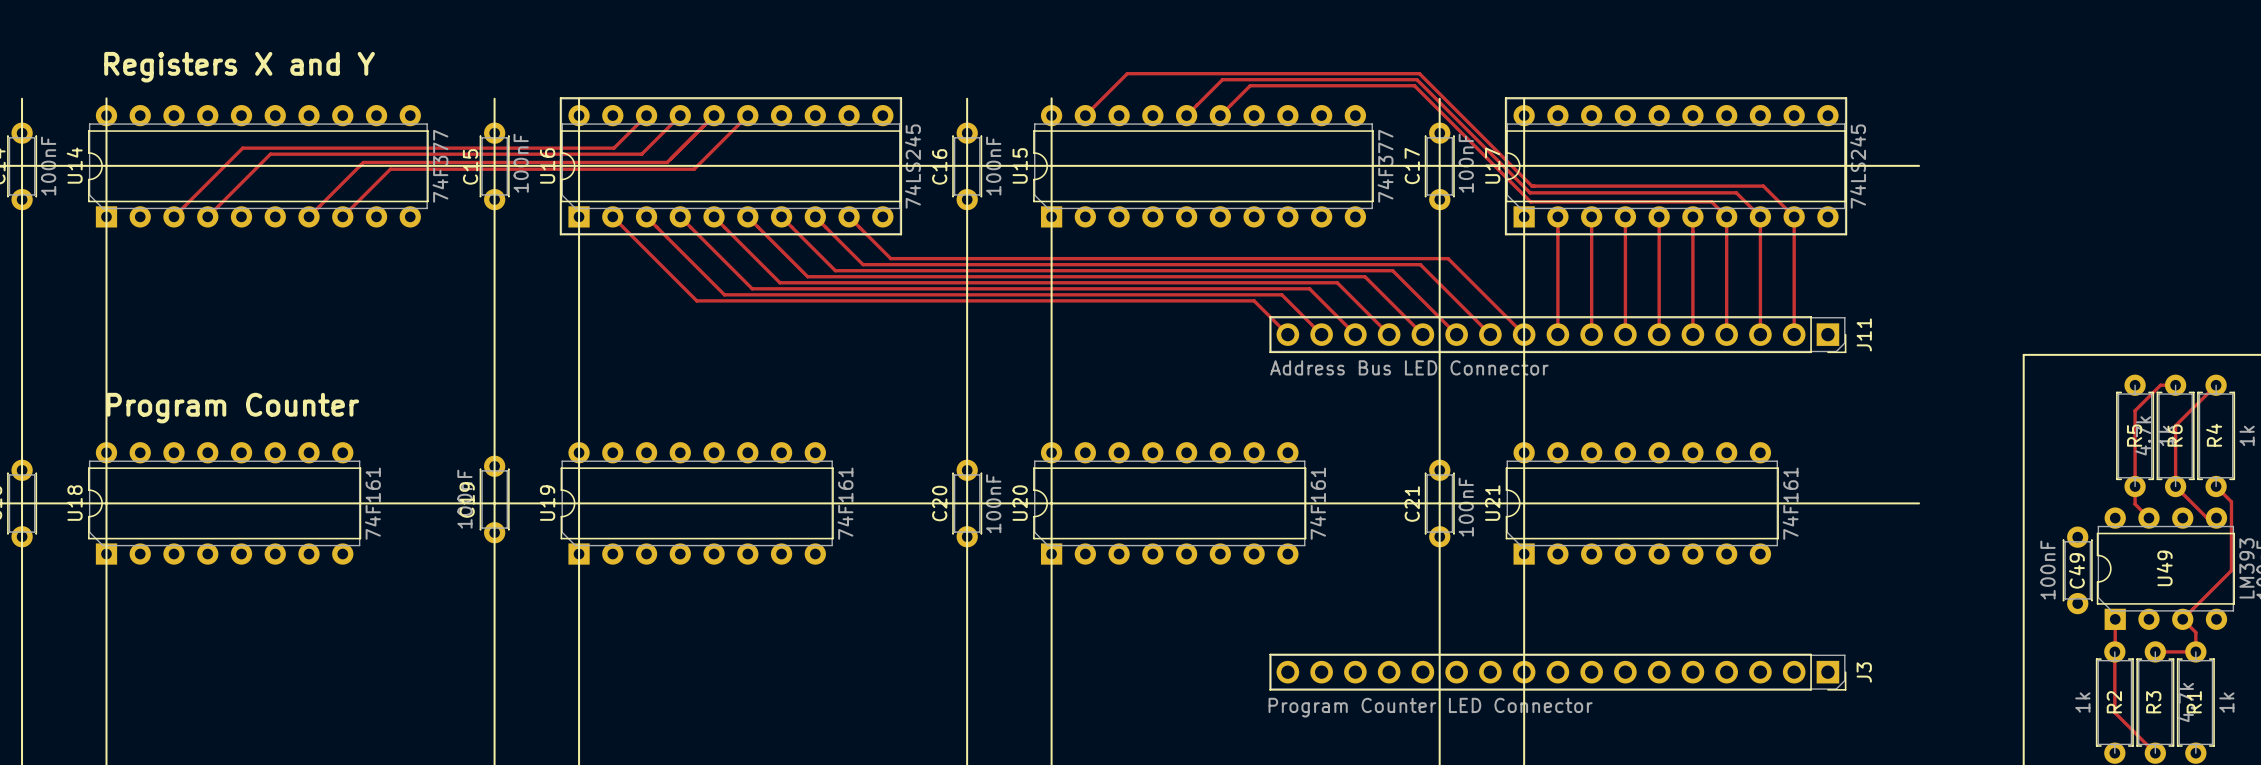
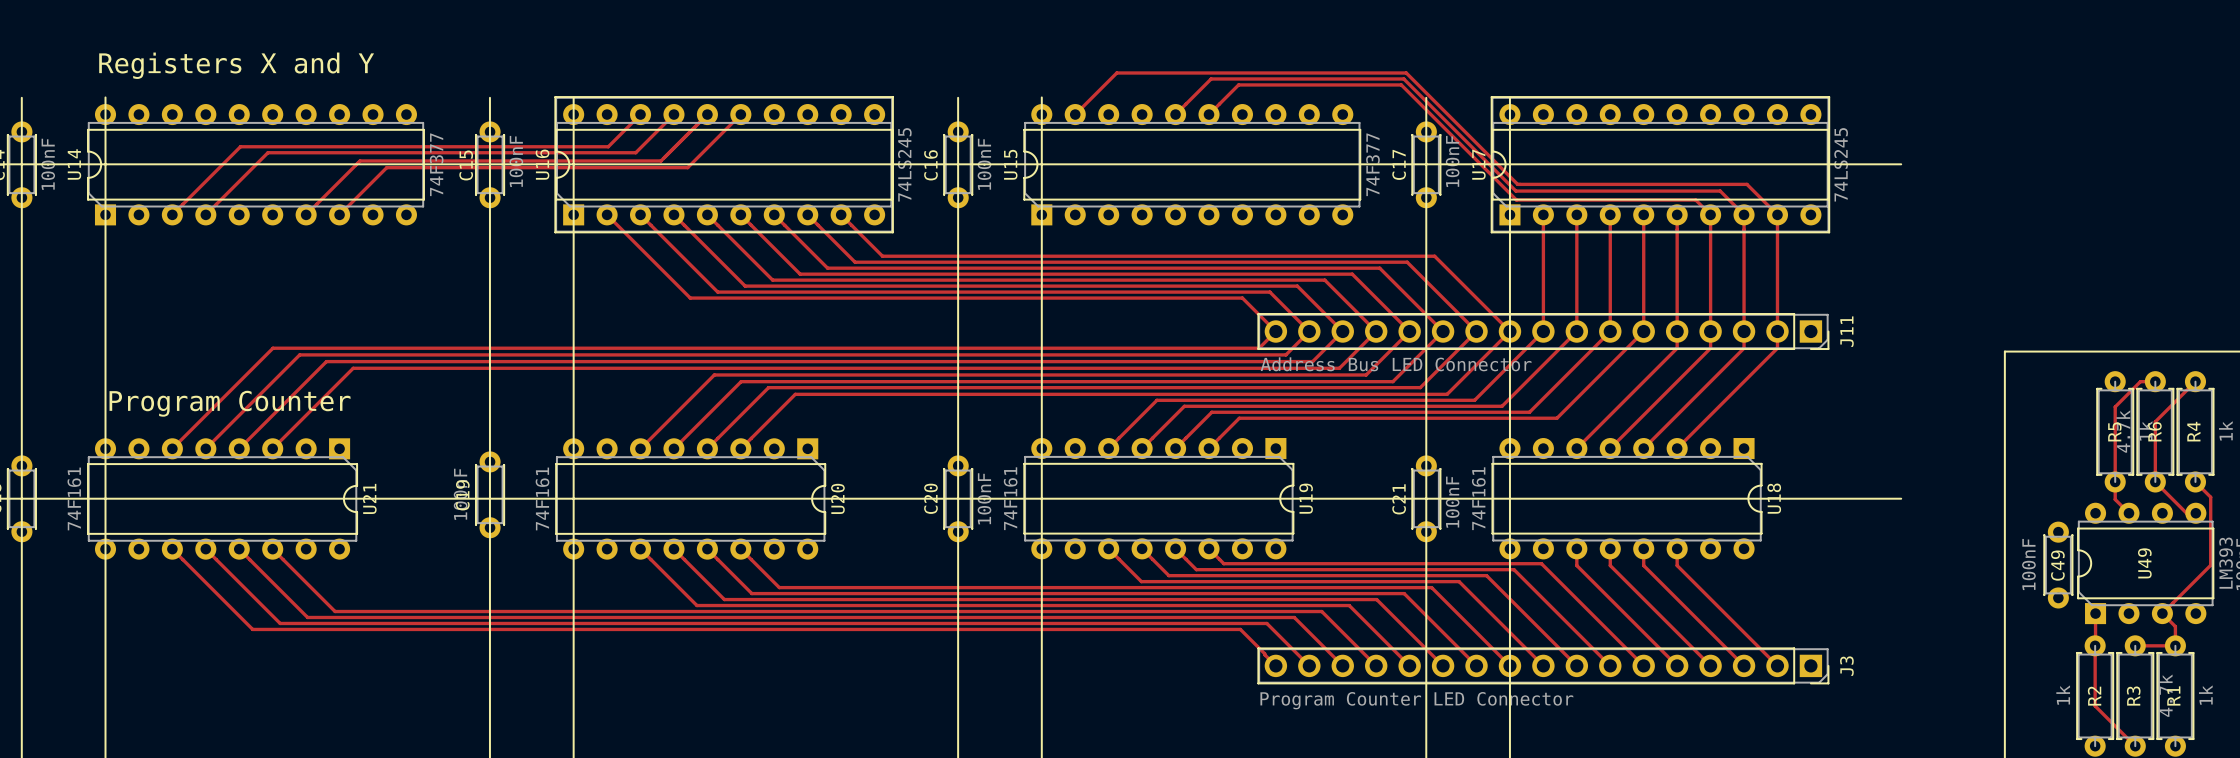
track: none -> (1275, 331) (1259, 348) (272, 348) (172, 448)
track: none -> (1309, 331) (1285, 354) (299, 354) (205, 448)
track: none -> (1342, 331) (1312, 361) (326, 361) (239, 448)
track: none -> (1376, 331) (1339, 368) (353, 368) (272, 448)
track: none -> (1409, 331) (1366, 374) (714, 374) (640, 448)
track: none -> (1443, 331) (1392, 381) (741, 381) (673, 448)
track: none -> (1476, 331) (1420, 387) (768, 387) (707, 448)
track: none -> (1509, 331) (1447, 394) (795, 394) (740, 448)
track: none -> (1543, 331) (1474, 400) (1156, 400) (1108, 448)
track: none -> (1576, 331) (1502, 406) (1184, 406) (1142, 448)
track: none -> (1610, 331) (1529, 412) (1211, 412) (1175, 448)
track: none -> (1643, 331) (1556, 418) (1239, 418) (1209, 448)
track: none -> (1677, 331) (1677, 348) (1576, 448)
track: none -> (1710, 331) (1710, 348) (1610, 448)
track: none -> (1744, 331) (1744, 348) (1643, 448)
track: none -> (1777, 331) (1777, 348) (1677, 448)
U18 rotation: 0° (224, 503) -> 180° (1627, 498)
U18 position: (224, 503) -> (1627, 498)
U19 rotation: 0° (697, 503) -> 180° (1158, 498)
U19 position: (697, 503) -> (1158, 498)
U20 rotation: 0° (1169, 503) -> 180° (690, 498)
U20 position: (1169, 503) -> (690, 498)
U21 rotation: 0° (1642, 503) -> 180° (222, 498)
U21 position: (1642, 503) -> (222, 498)
track: none -> (172, 549) (252, 629) (1240, 629) (1275, 665)
track: none -> (205, 549) (280, 623) (1266, 623) (1309, 665)
track: none -> (239, 549) (307, 617) (1294, 617) (1342, 665)
track: none -> (272, 549) (335, 611) (1321, 611) (1376, 665)
track: none -> (640, 549) (696, 605) (1349, 605) (1409, 665)
track: none -> (673, 549) (724, 599) (1376, 599) (1443, 665)
track: none -> (707, 549) (751, 593) (1404, 593) (1476, 665)
track: none -> (740, 549) (779, 587) (1431, 587) (1509, 665)
track: none -> (1108, 548) (1141, 581) (1459, 581) (1543, 665)
track: none -> (1142, 548) (1168, 575) (1486, 575) (1576, 665)
track: none -> (1175, 548) (1196, 569) (1514, 569) (1610, 665)
track: none -> (1209, 548) (1223, 563) (1541, 563) (1643, 665)
track: none -> (1576, 548) (1576, 565) (1677, 665)
track: none -> (1610, 548) (1610, 565) (1710, 665)
track: none -> (1643, 548) (1643, 565) (1744, 665)
track: none -> (1677, 548) (1677, 565) (1777, 665)

